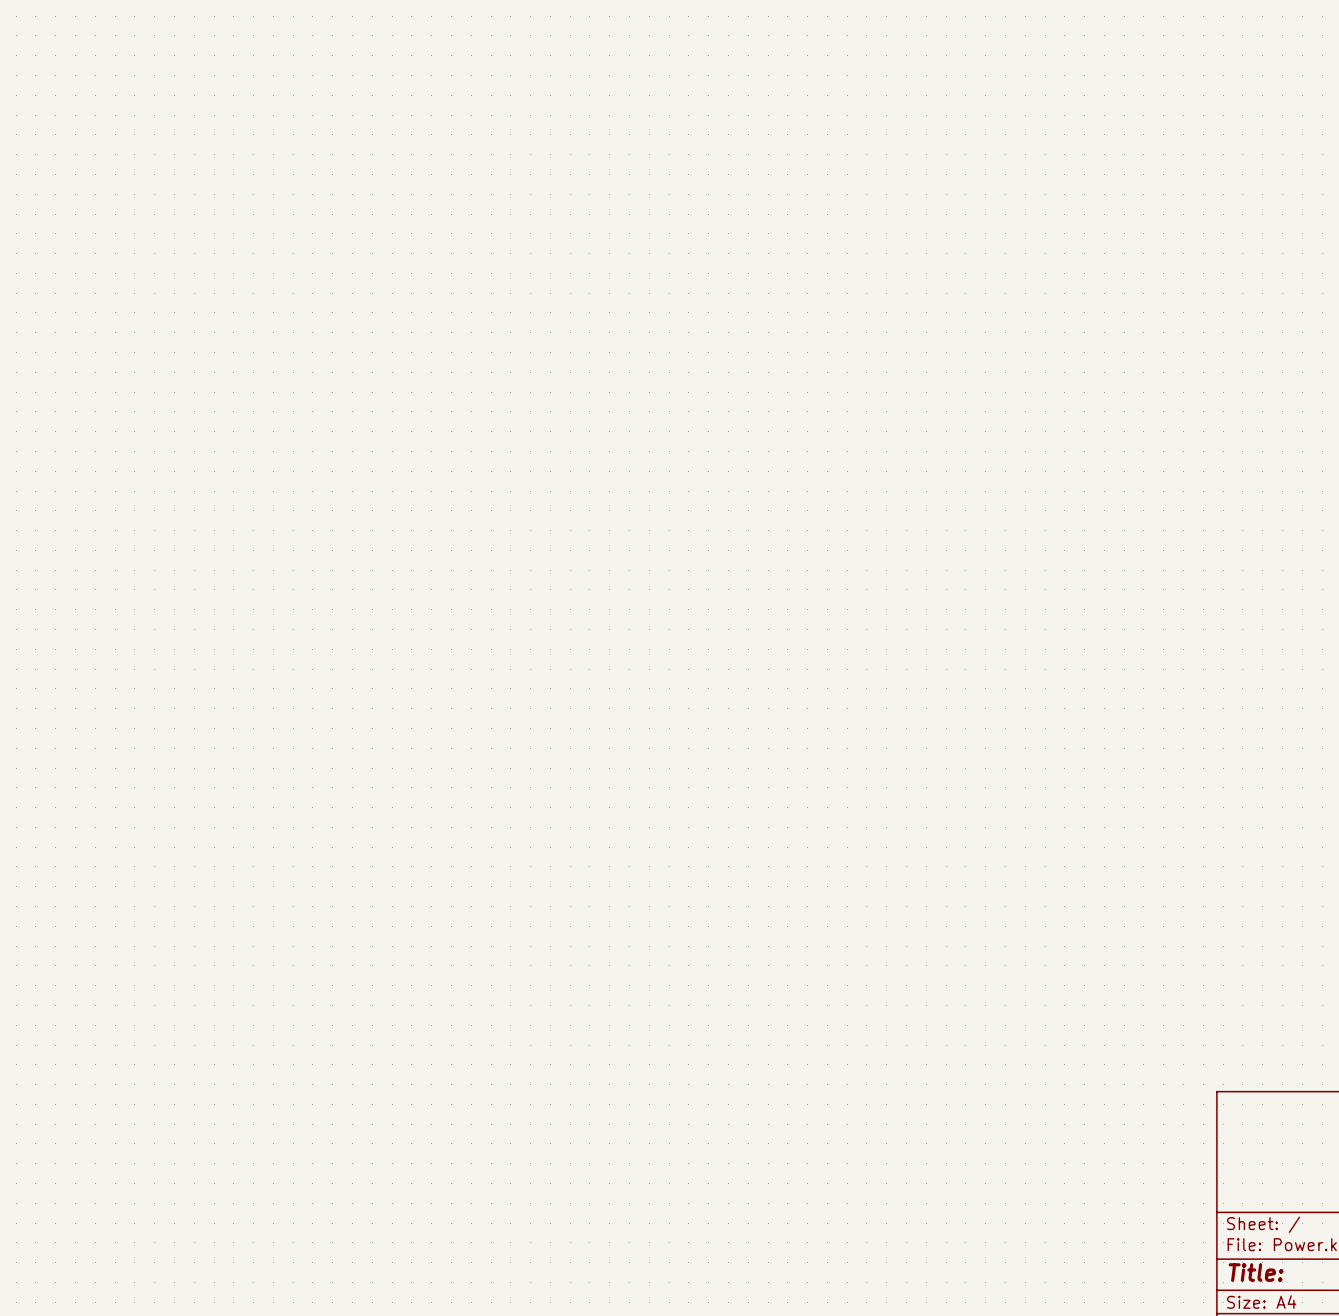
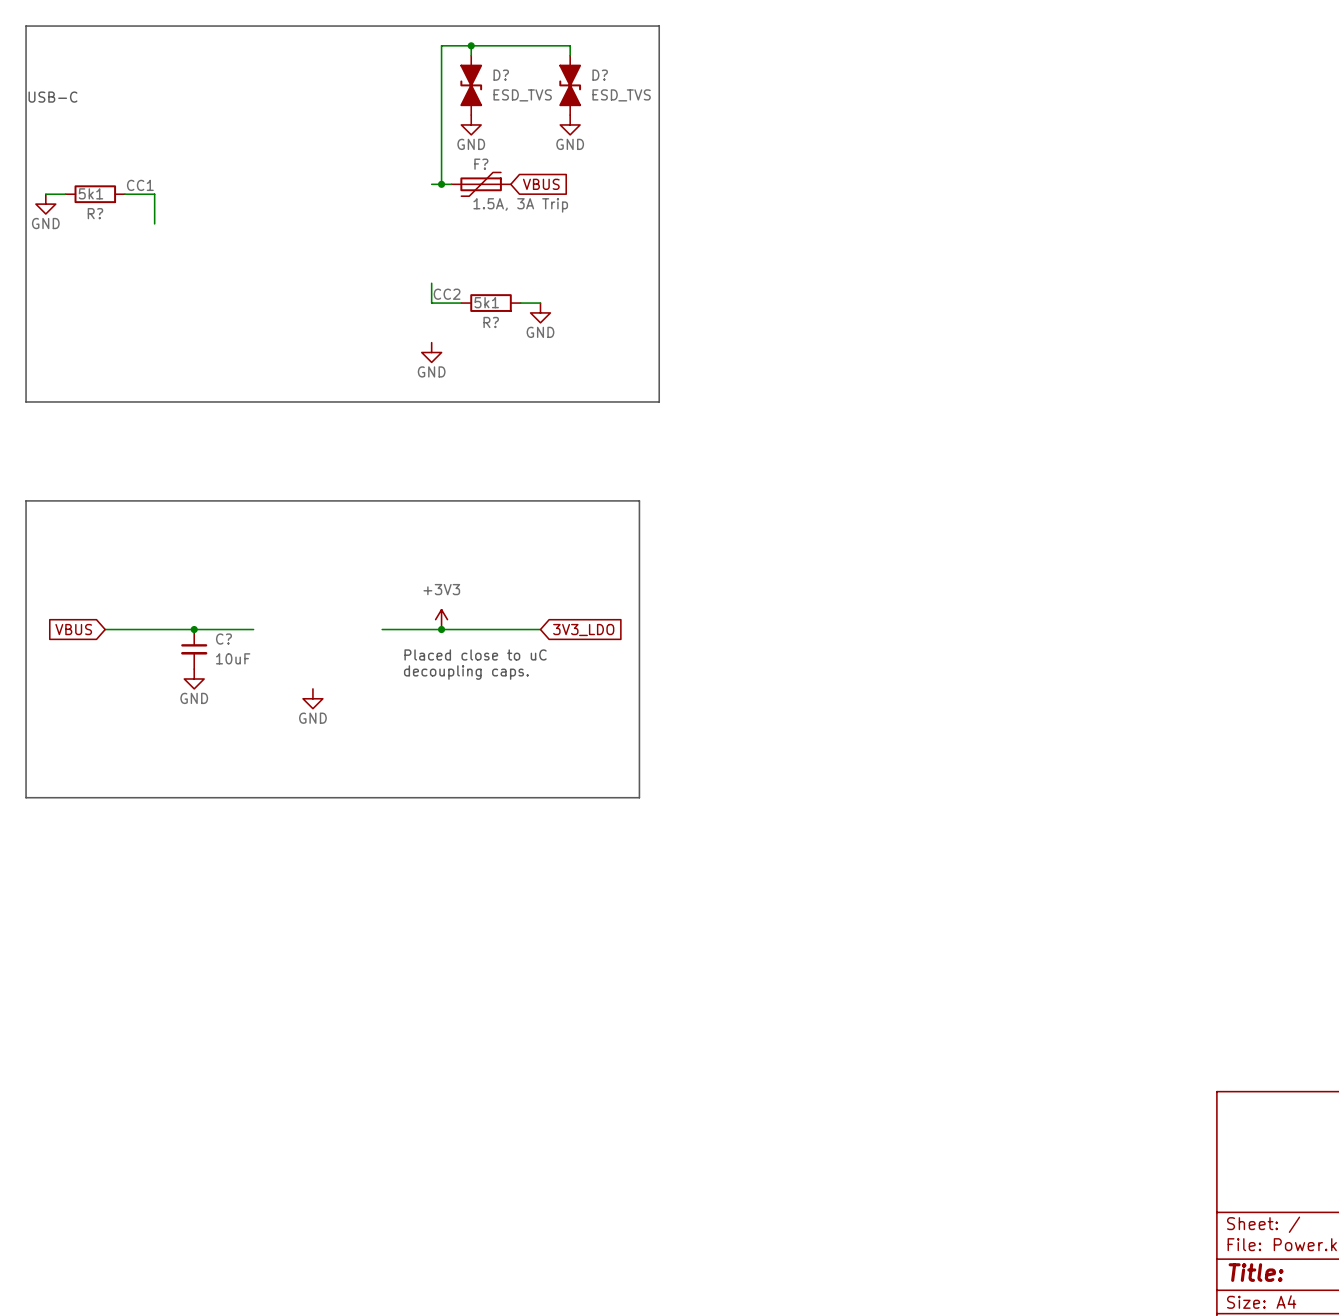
line: none -> (26, 26) (659, 26) (659, 401) (26, 401) (26, 26)
wire: none -> (471, 45) (471, 55)
junction: none -> (471, 45)
wire: none -> (570, 55) (570, 45) (441, 45) (441, 184)
D?: none -> ESD_TVS (471, 85)
D?: none -> ESD_TVS (570, 85)
text: none -> USB-C (52, 97)
power symbol: none -> GND (471, 124)
power symbol: none -> GND (570, 124)
wire: none -> (431, 184) (451, 184)
junction: none -> (441, 184)
F?: none -> 1.5A, 3A Trip (481, 184)
global label: none -> VBUS (541, 184)
label: none -> CC1 (140, 185)
wire: none -> (45, 194) (65, 194)
R?: none -> 5k1 (95, 194)
wire: none -> (124, 194) (154, 194) (154, 223)
power symbol: none -> GND (45, 204)
wire: none -> (431, 283) (431, 303) (461, 303)
label: none -> CC2 (447, 294)
R?: none -> 5k1 (491, 303)
wire: none -> (520, 303) (540, 303)
power symbol: none -> GND (540, 312)
power symbol: none -> GND (431, 352)
line: none -> (26, 500) (26, 797) (639, 797) (639, 500) (26, 500)
power symbol: none -> +3V3 (441, 619)
global label: none -> VBUS (73, 629)
wire: none -> (105, 629) (253, 629)
junction: none -> (194, 629)
wire: none -> (382, 629) (540, 629)
junction: none -> (441, 629)
global label: none -> 3V3_LDO (583, 630)
C?: none -> 10uF (194, 649)
text: none -> Placed close to uC (475, 654)
text: none -> decoupling caps. (466, 672)
power symbol: none -> GND (194, 679)
power symbol: none -> GND (312, 698)

